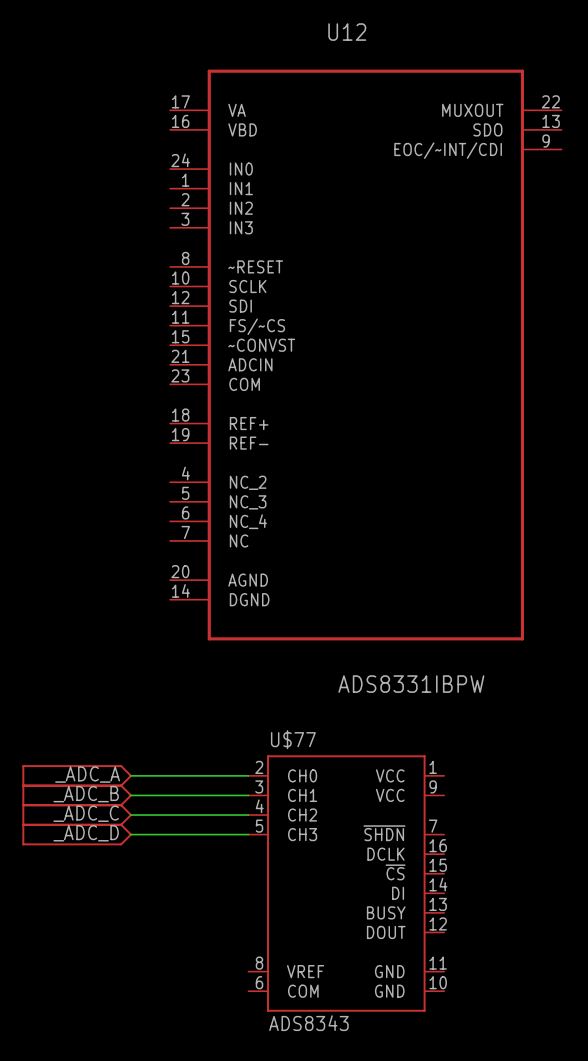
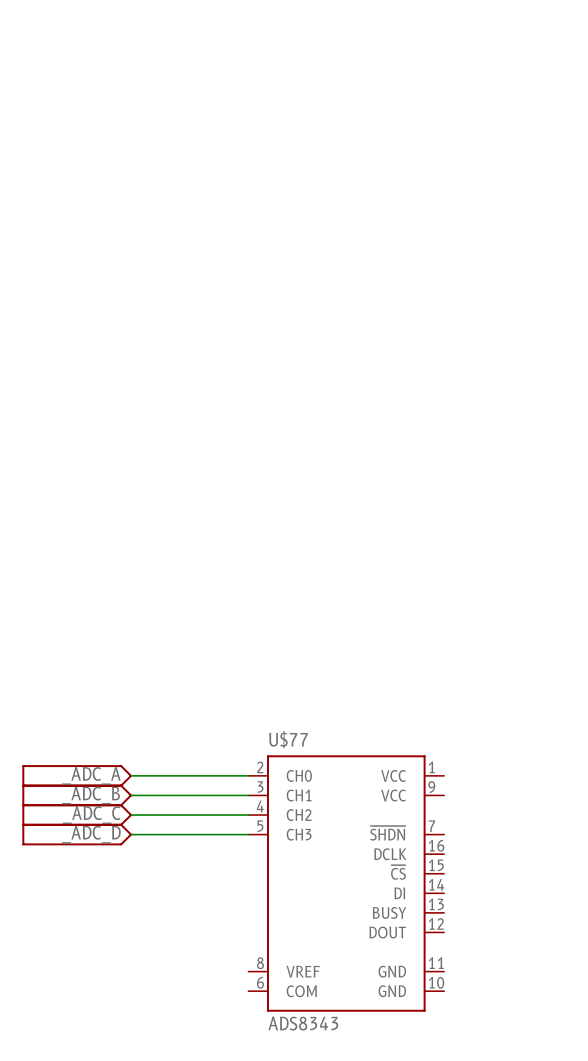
U12: ADS8331IBPW (365, 355) -> none

